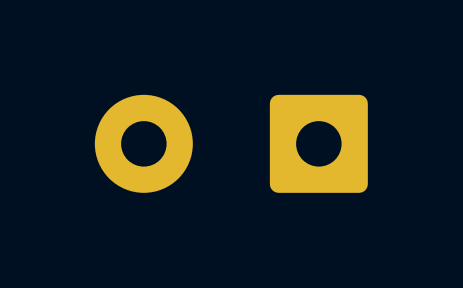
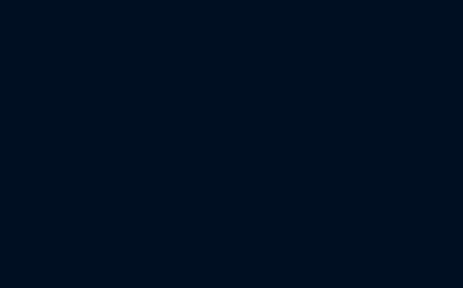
part: (231, 143) -> none

